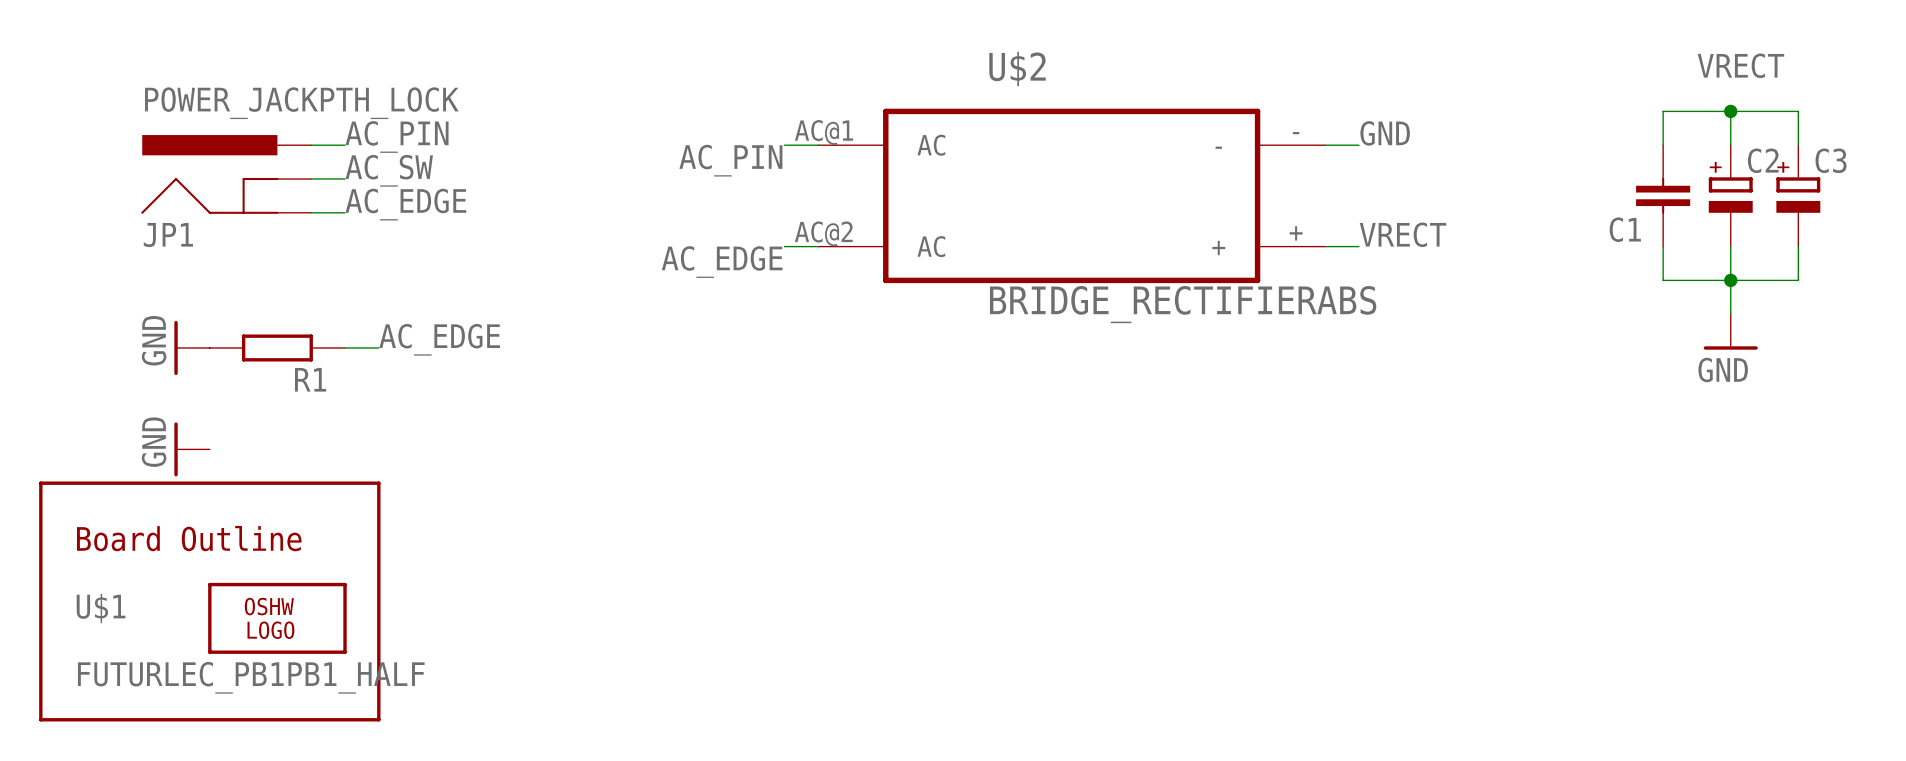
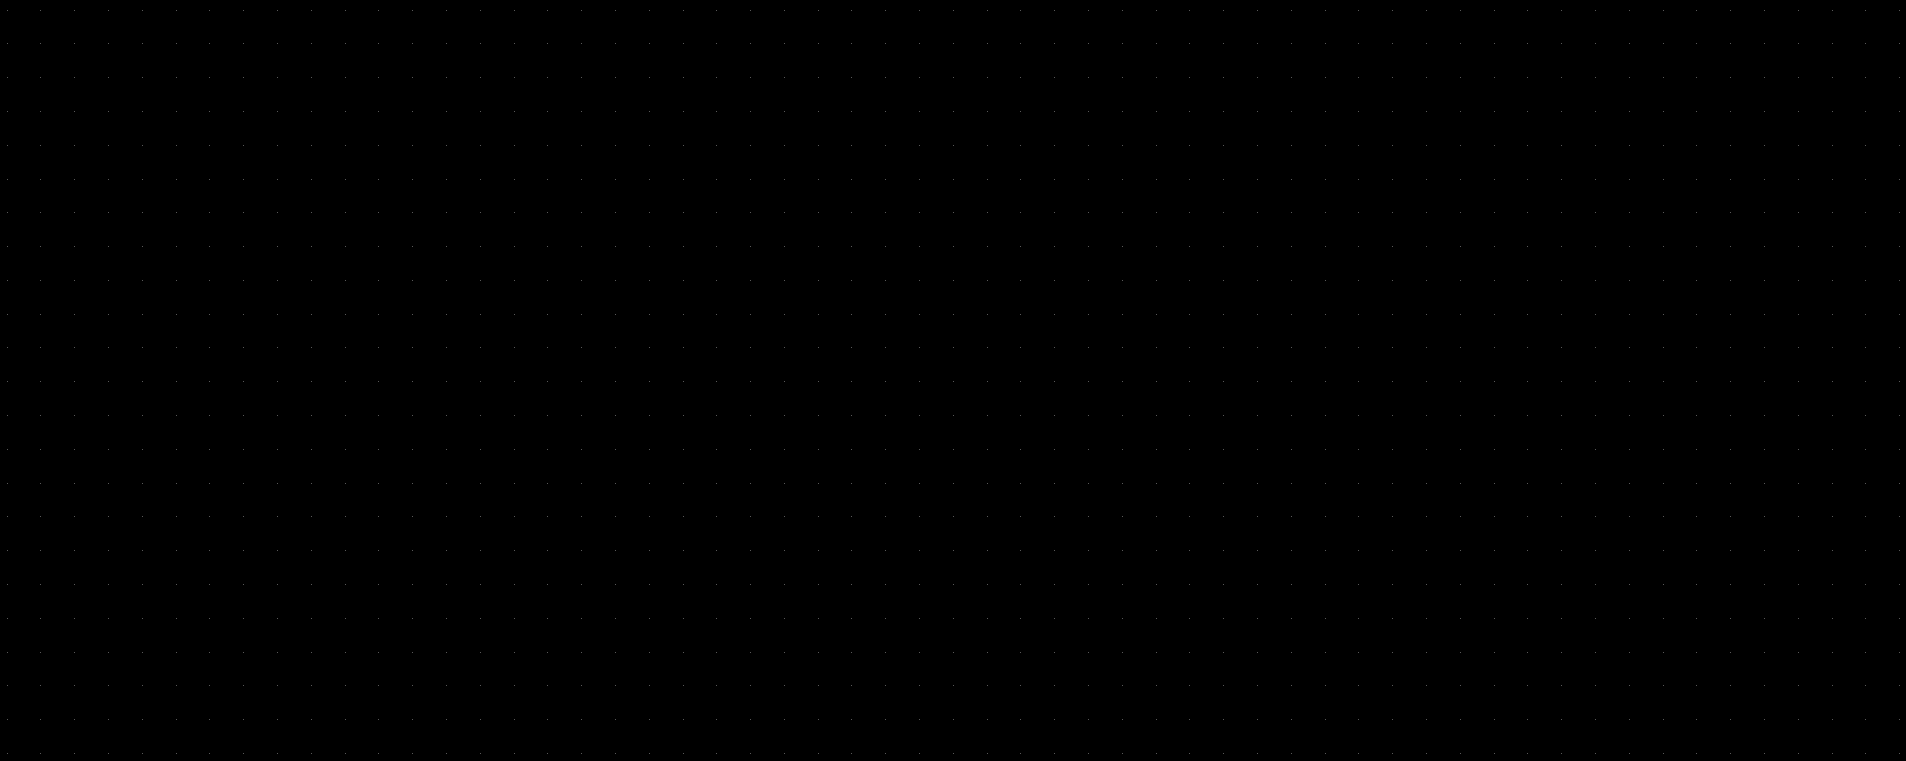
label: VRECT (1740, 65) -> none
wire: (1730, 111) (1730, 145) -> none
junction: (1730, 111) -> none
label: GND (1385, 133) -> none
label: AC_PIN (397, 136) -> none
wire: (311, 145) (345, 145) -> none
wire: (784, 145) (818, 145) -> none
wire: (1325, 145) (1358, 145) -> none
wire: (1663, 145) (1663, 111) (1798, 111) (1798, 145) -> none
label: AC_PIN (730, 160) -> none
label: AC_SW (389, 170) -> none
JP1: POWER_JACKPTH_LOCK (226, 174) -> none
wire: (311, 179) (345, 179) -> none
U$2: BRIDGE_RECTIFIERABS (1071, 195) -> none
C1: (1663, 195) -> none
C2: (1730, 195) -> none
C3: (1798, 195) -> none
label: AC_EDGE (405, 204) -> none
wire: (311, 212) (345, 212) -> none
label: VRECT (1402, 234) -> none
wire: (784, 246) (818, 246) -> none
wire: (1325, 246) (1358, 246) -> none
wire: (1663, 246) (1663, 280) (1798, 280) (1798, 246) -> none
wire: (1730, 246) (1730, 314) -> none
label: AC_EDGE (722, 262) -> none
junction: (1730, 280) -> none
power symbol: GND (1730, 331) -> none
label: AC_EDGE (439, 339) -> none
power symbol: GND (192, 347) -> none
R1: (277, 347) -> none
wire: (345, 347) (378, 347) -> none
power symbol: GND (192, 449) -> none
U$1: FUTURLEC_PB1PB1_HALF (209, 601) -> none
part: (277, 618) -> none

